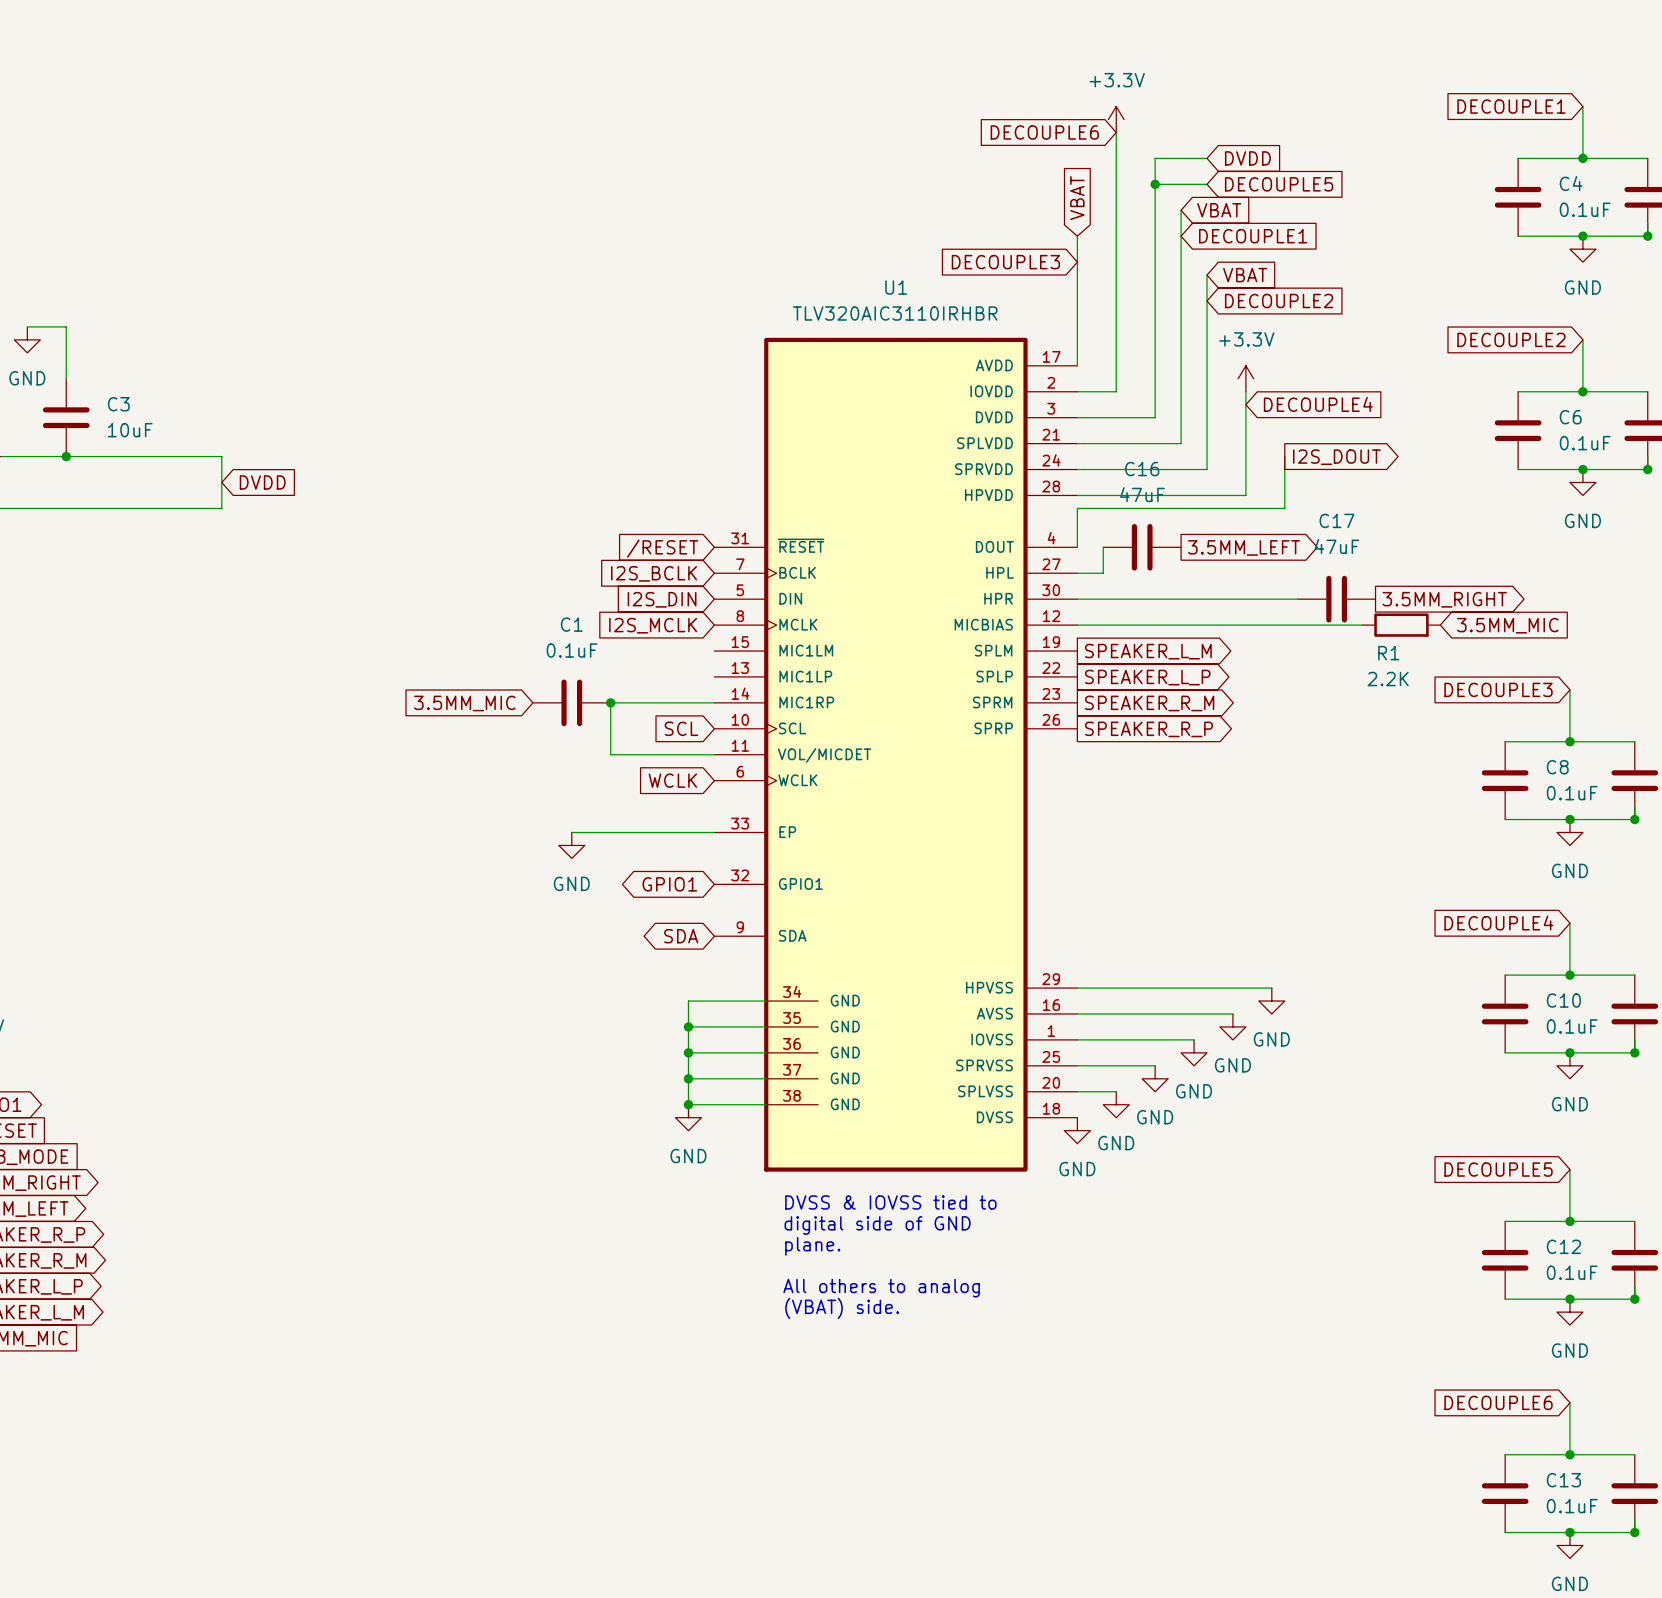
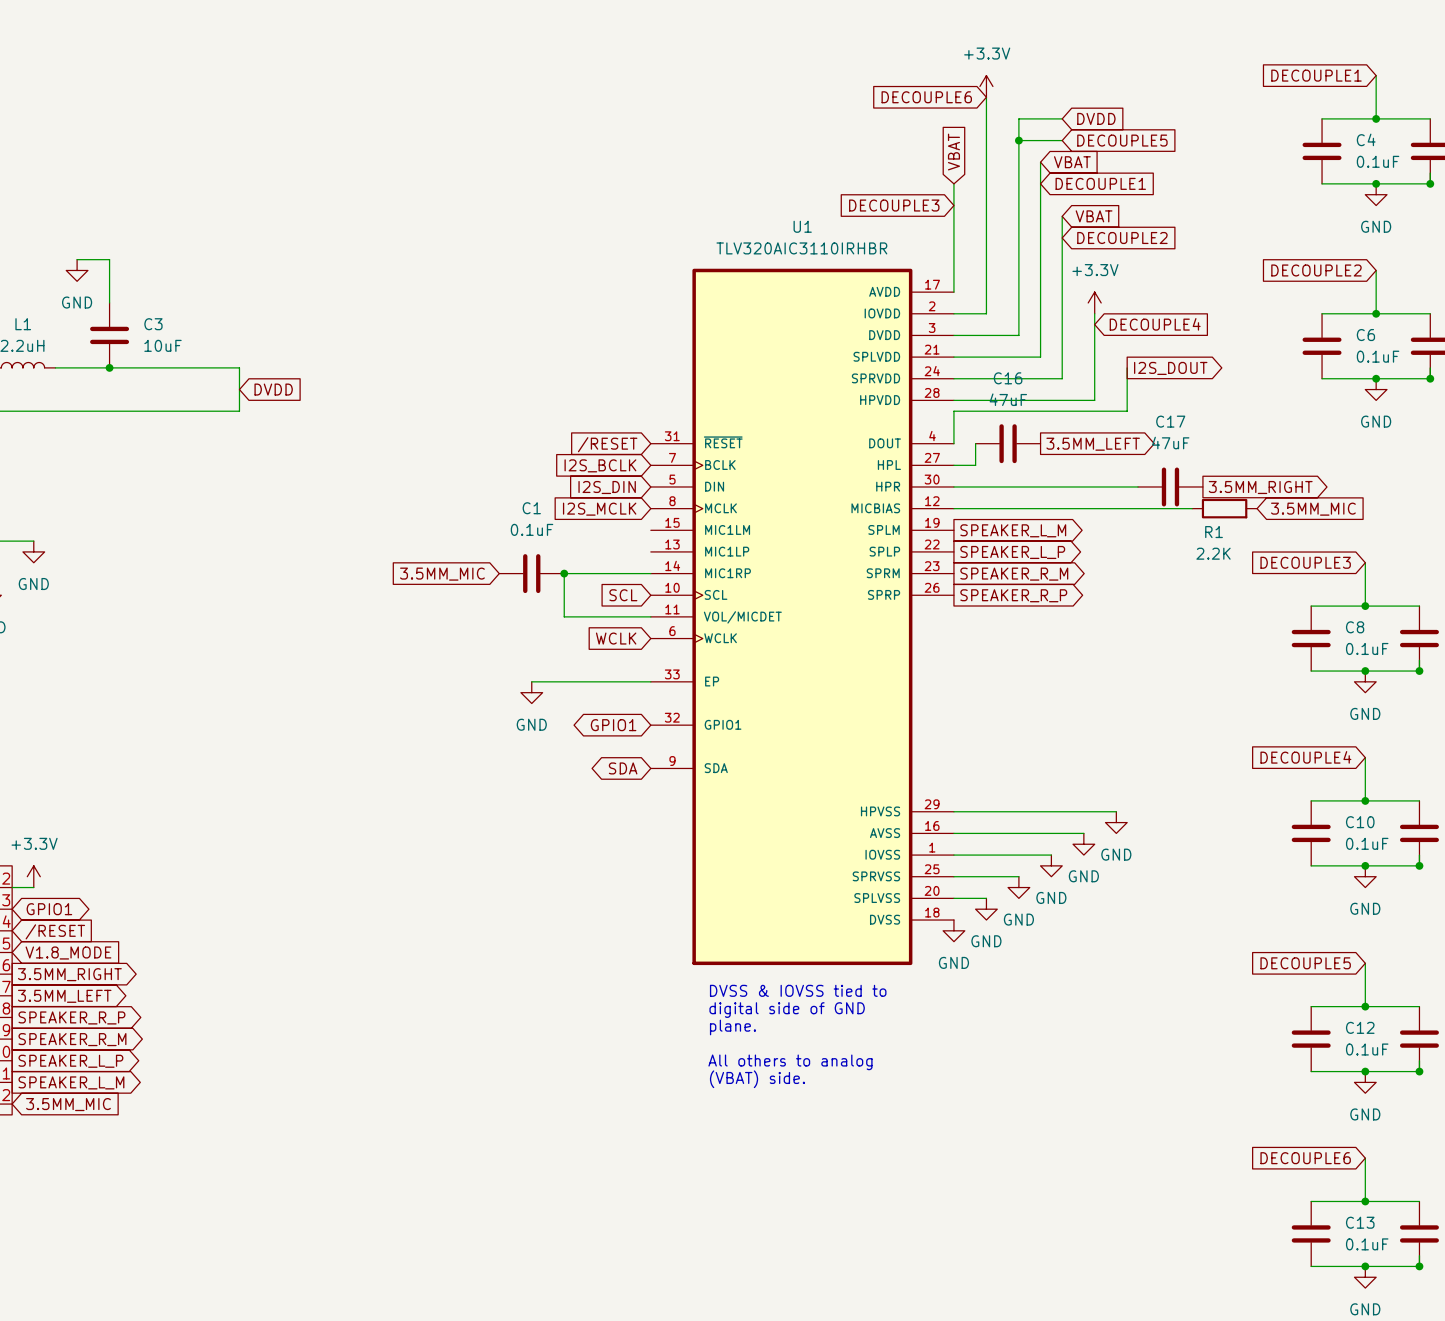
U1 symbol: [714, 337, 1078, 1172] -> [650, 268, 954, 966]
wire: (766, 1001) (688, 1001) (688, 1104) (766, 1104) -> none
wire: (688, 1026) (766, 1026) -> none
junction: (688, 1026) -> none
wire: (688, 1052) (766, 1052) -> none
junction: (688, 1052) -> none
wire: (688, 1078) (766, 1078) -> none
junction: (688, 1078) -> none
junction: (688, 1104) -> none
power symbol: GND (688, 1117) -> none

